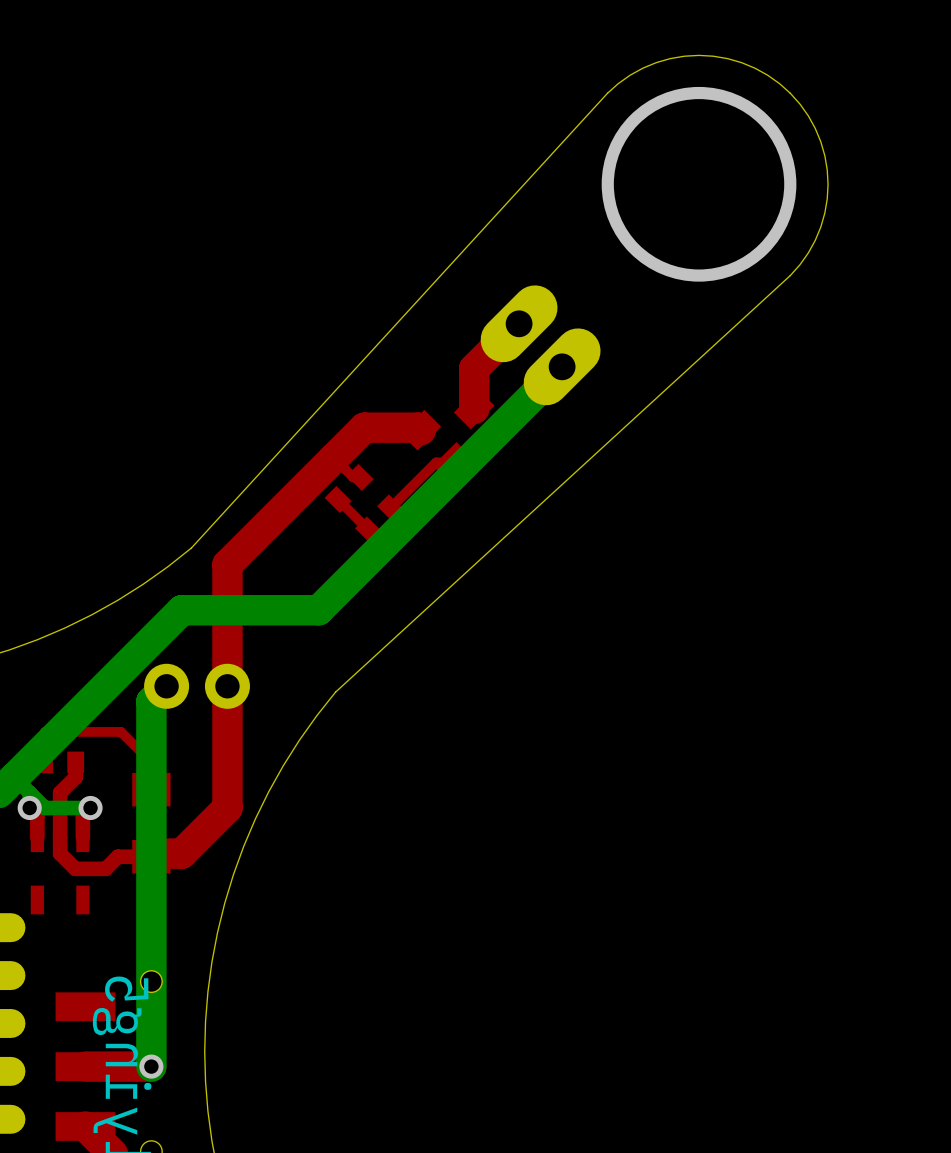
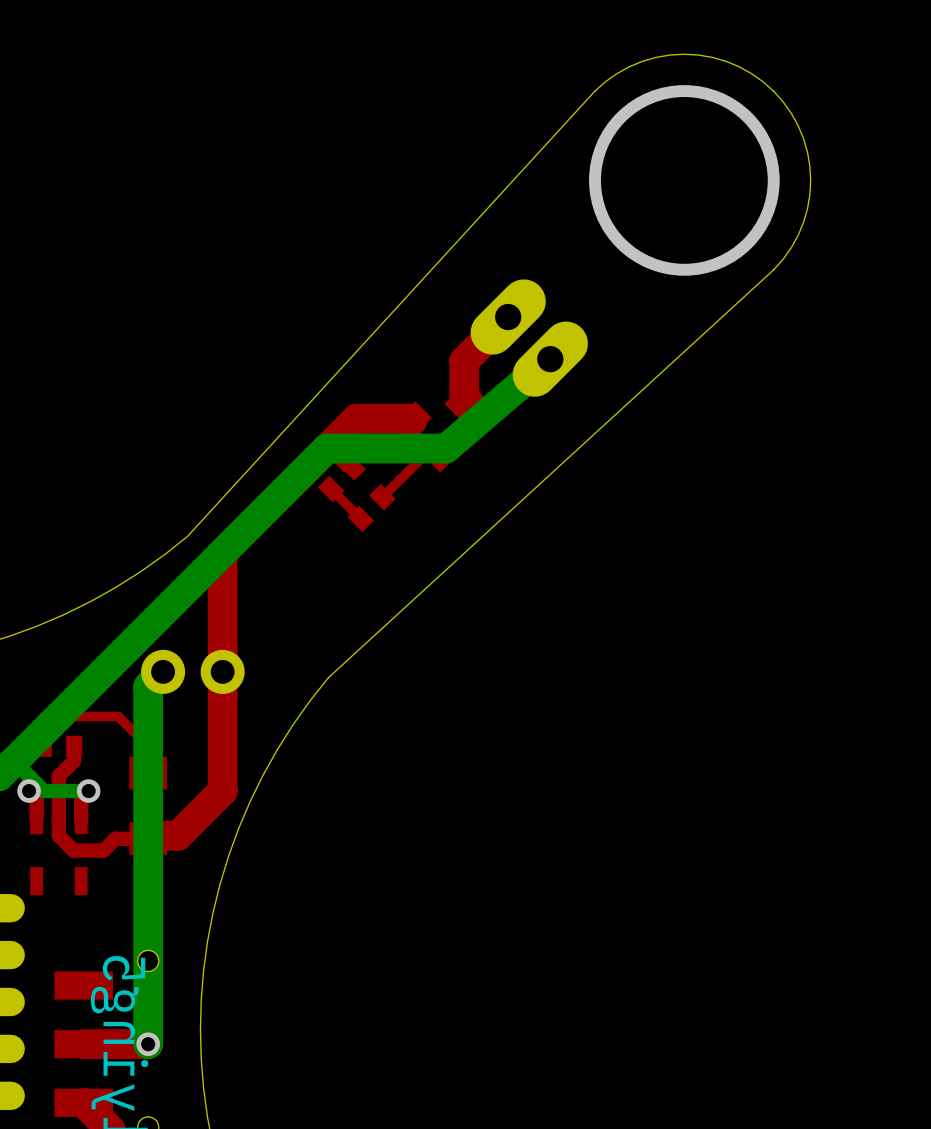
bottom track: (562, 366) (318, 610) (181, 610) -> (550, 359) (446, 448) (326, 448) (178, 597)

